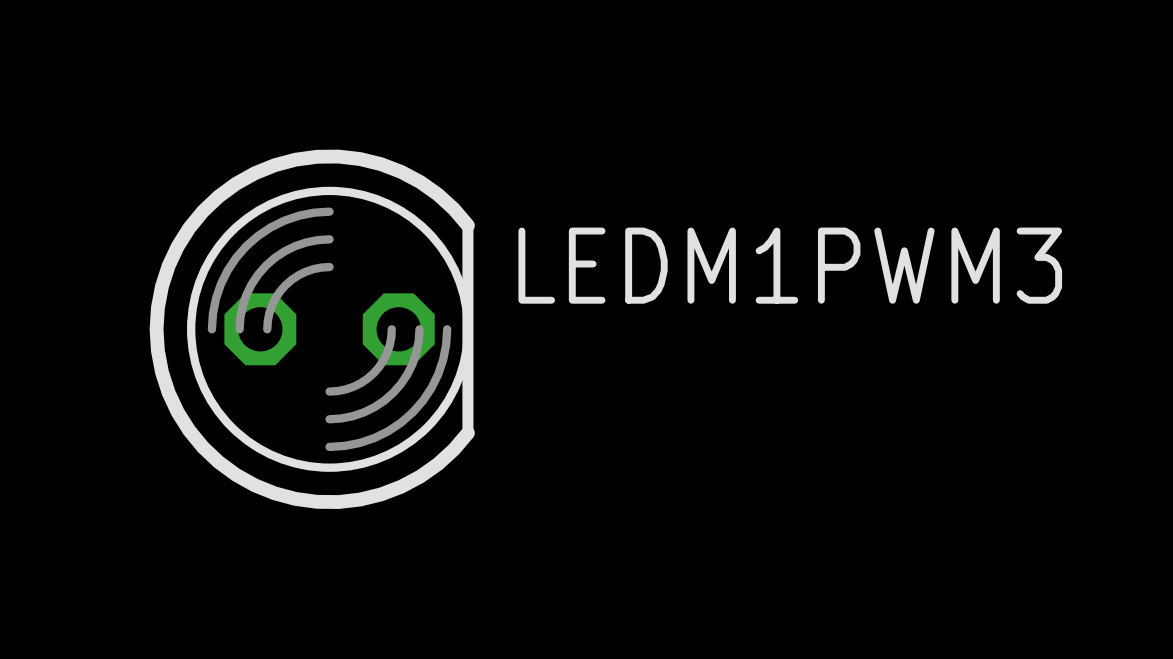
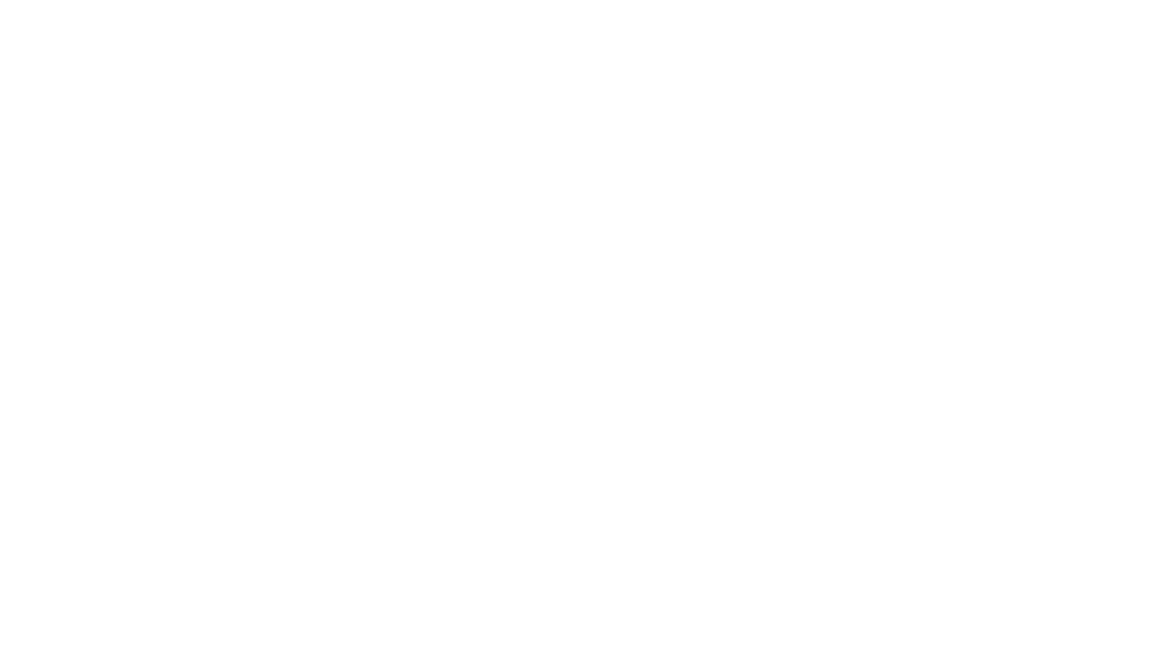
LEDM1PWM3: (312, 329) -> none

